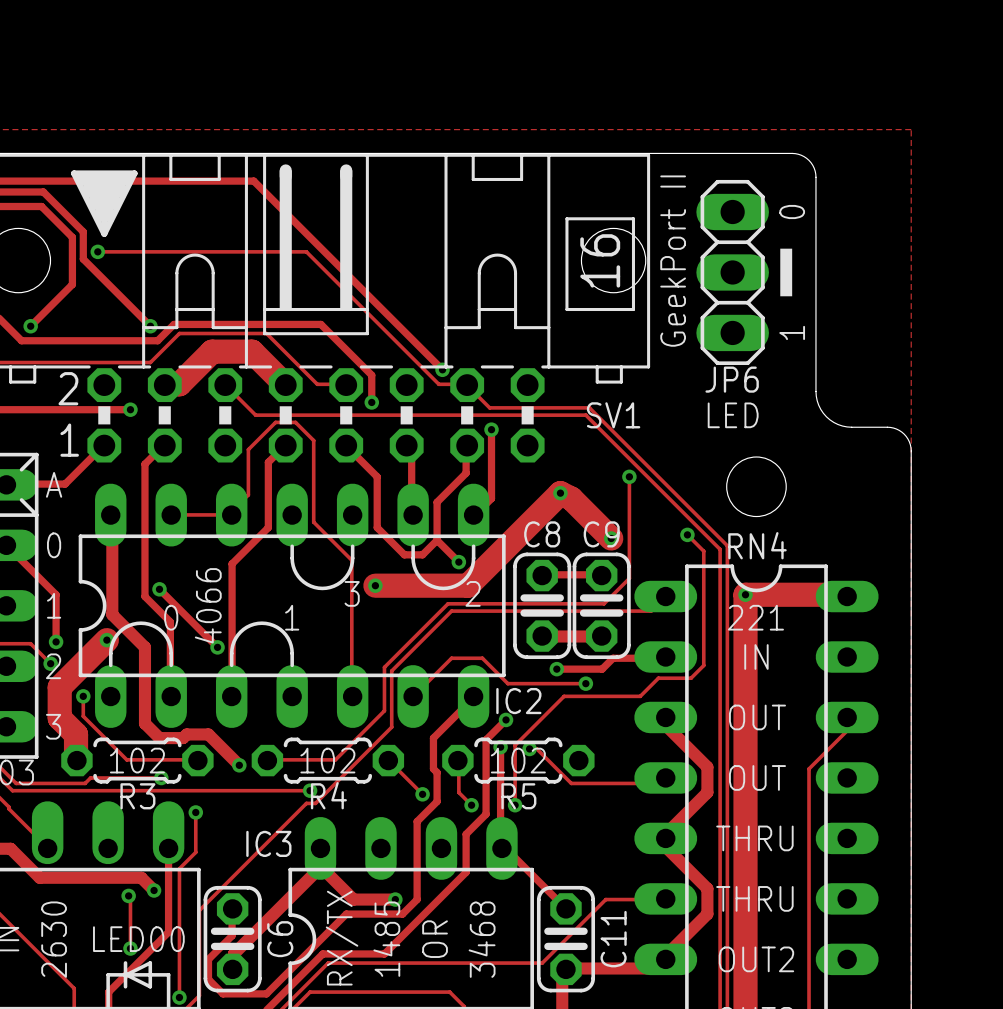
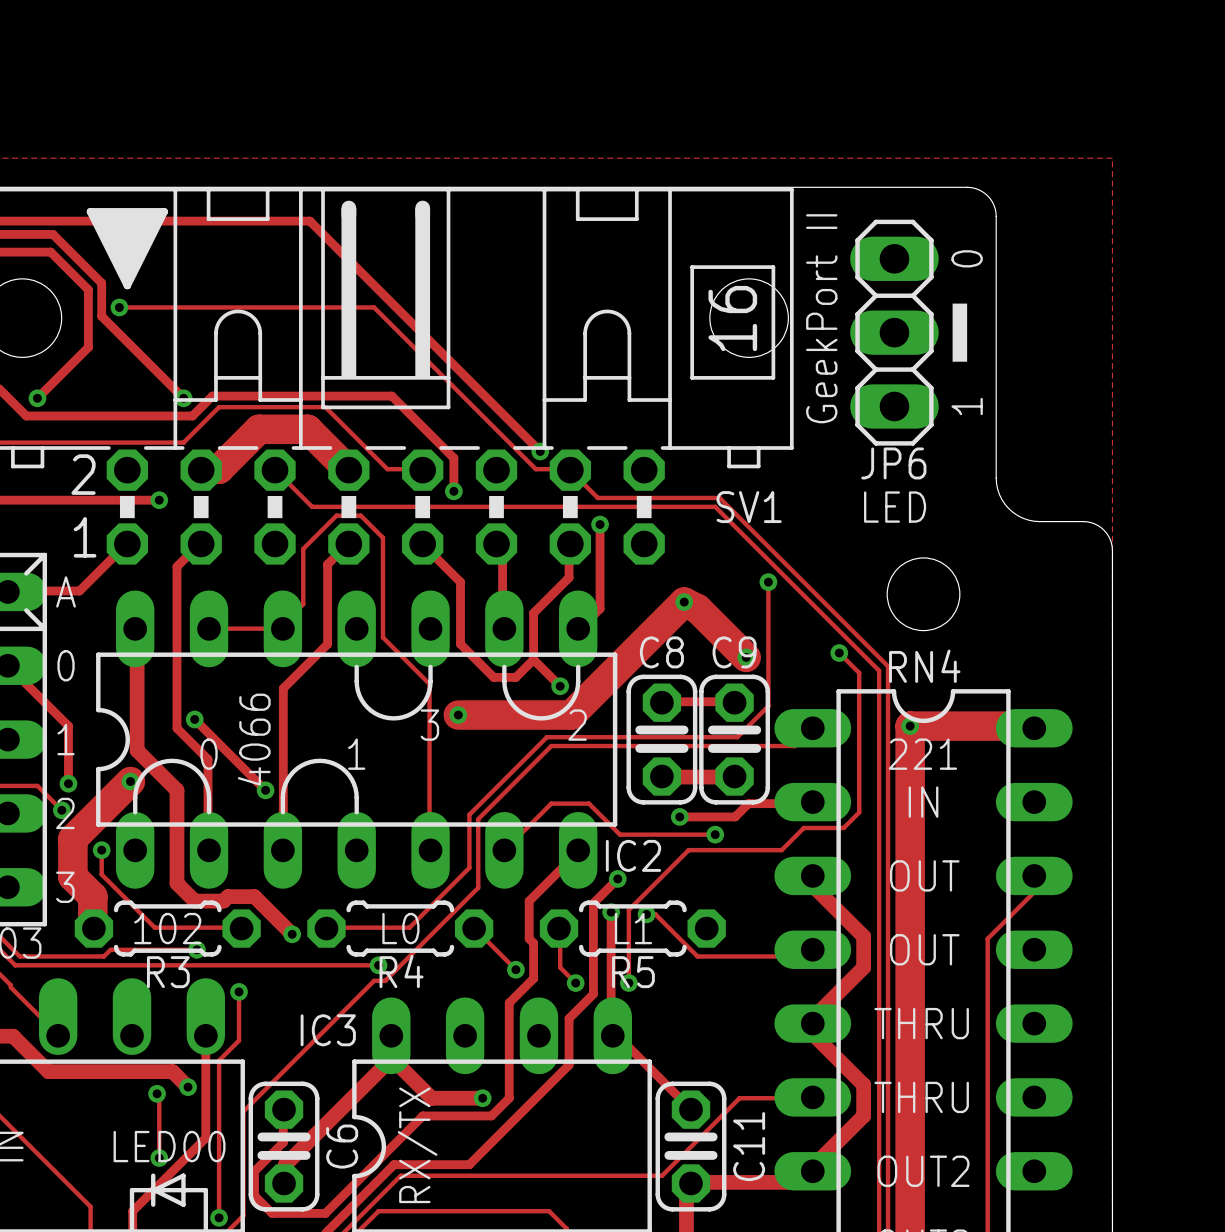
text: 102 (327, 760) -> L0 (400, 928)
text: 102 (518, 760) -> L1 (633, 928)
text: 2630 (54, 939) -> none
text: 1485 (386, 939) -> none
text: OR (435, 939) -> none
text: 3468 (482, 939) -> none

